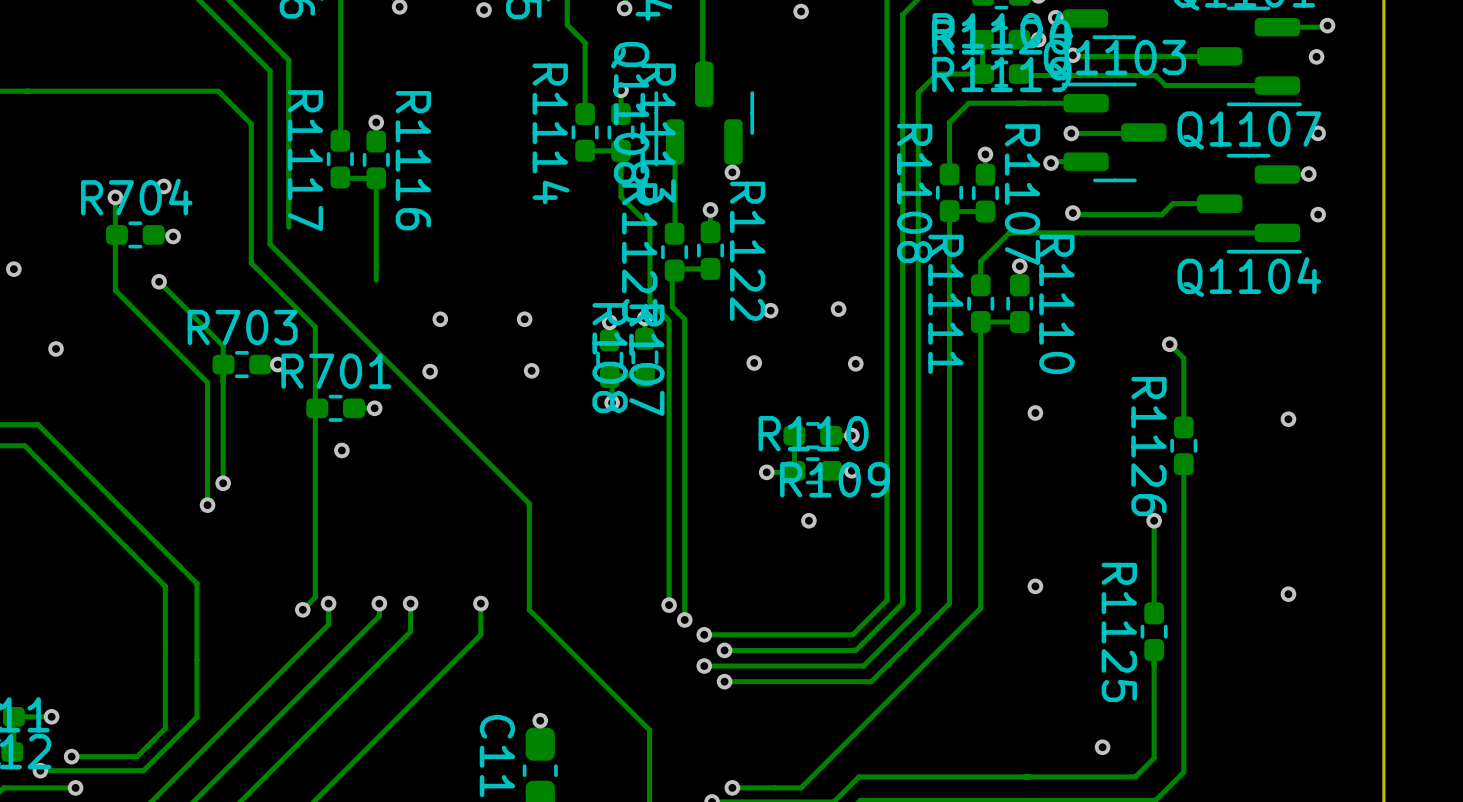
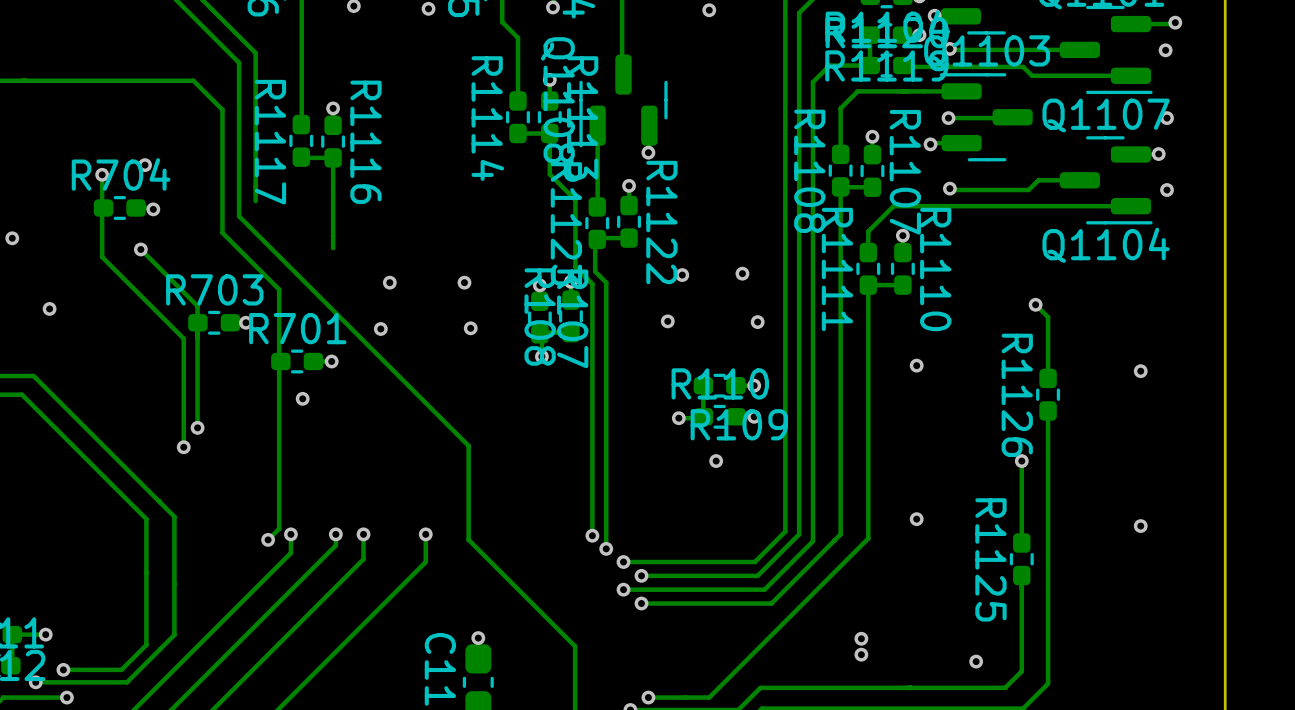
via: none -> (861, 638)
via: none -> (861, 654)

